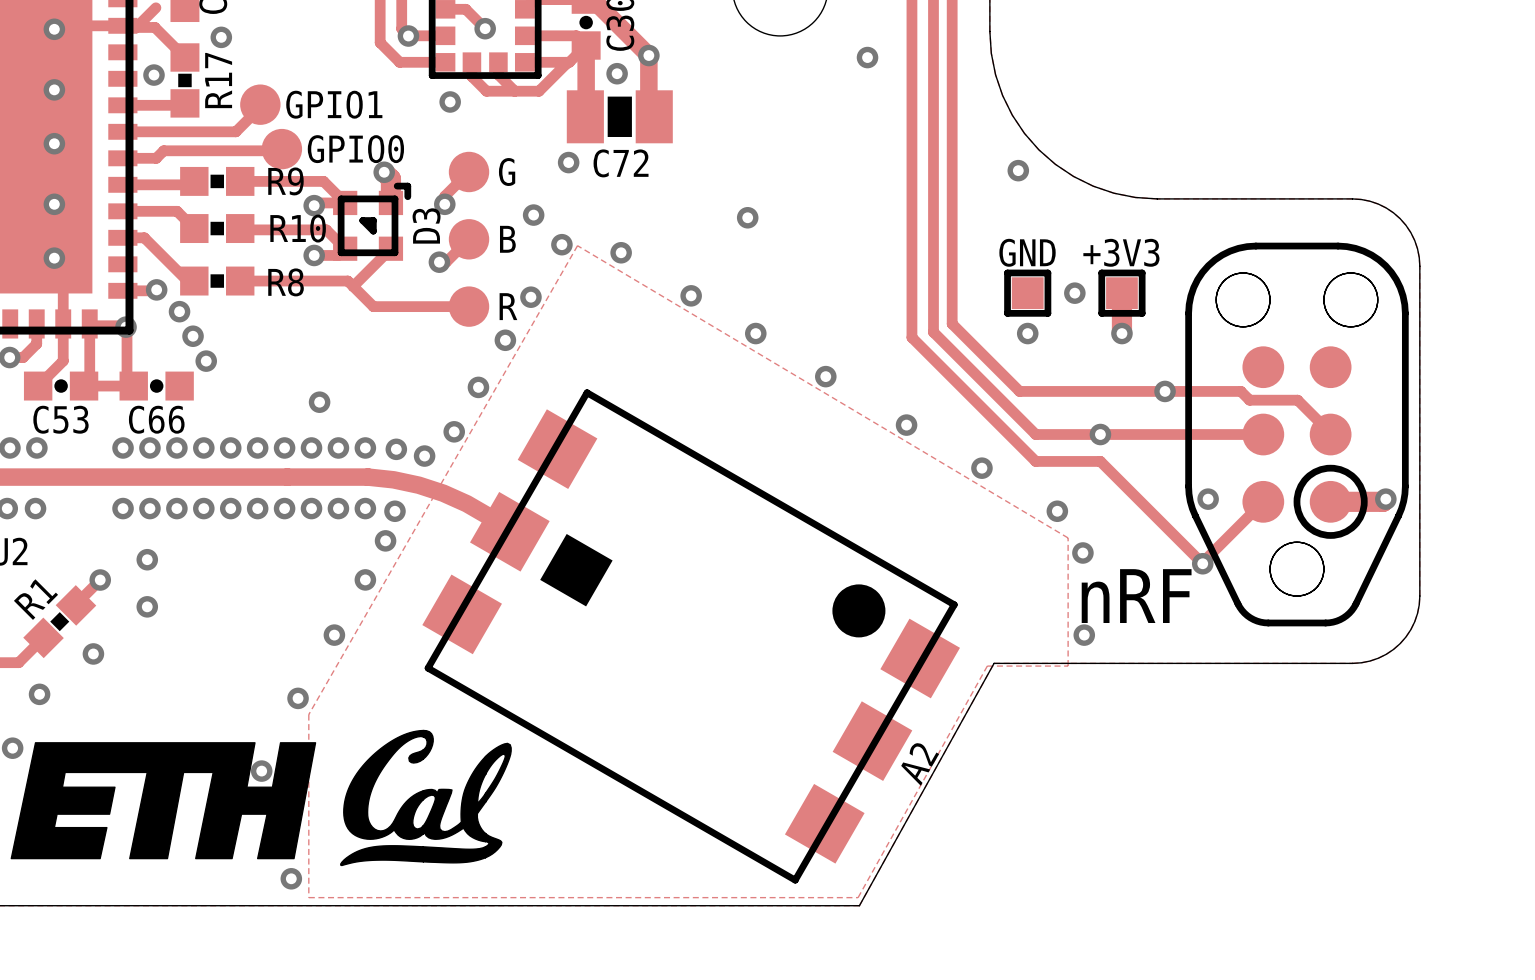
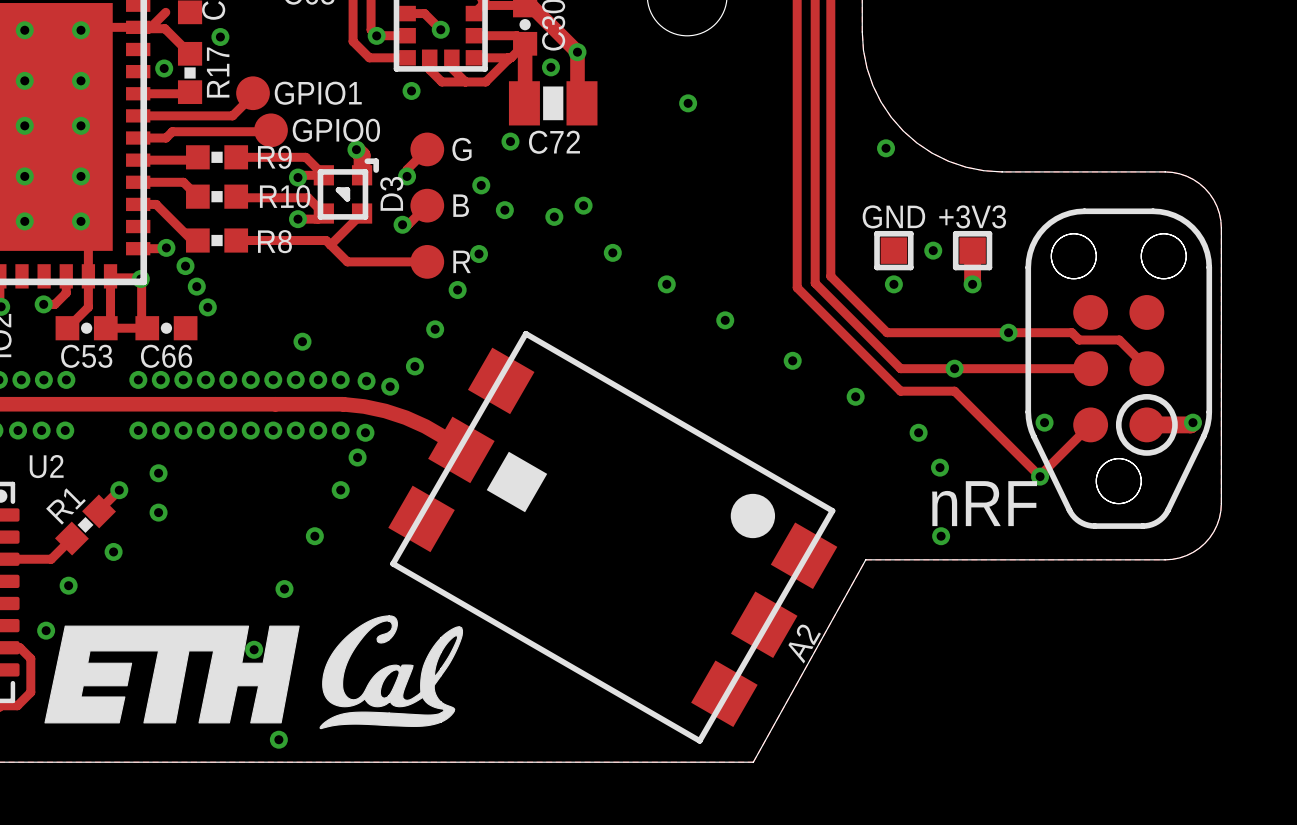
via: (867, 57) -> none
via: none -> (688, 103)
via: (747, 217) -> none
via: none -> (583, 205)
zone outline: (577, 245) (308, 714) (308, 897) (858, 897) (987, 666) (1068, 666) (1068, 537) (577, 245) -> none

